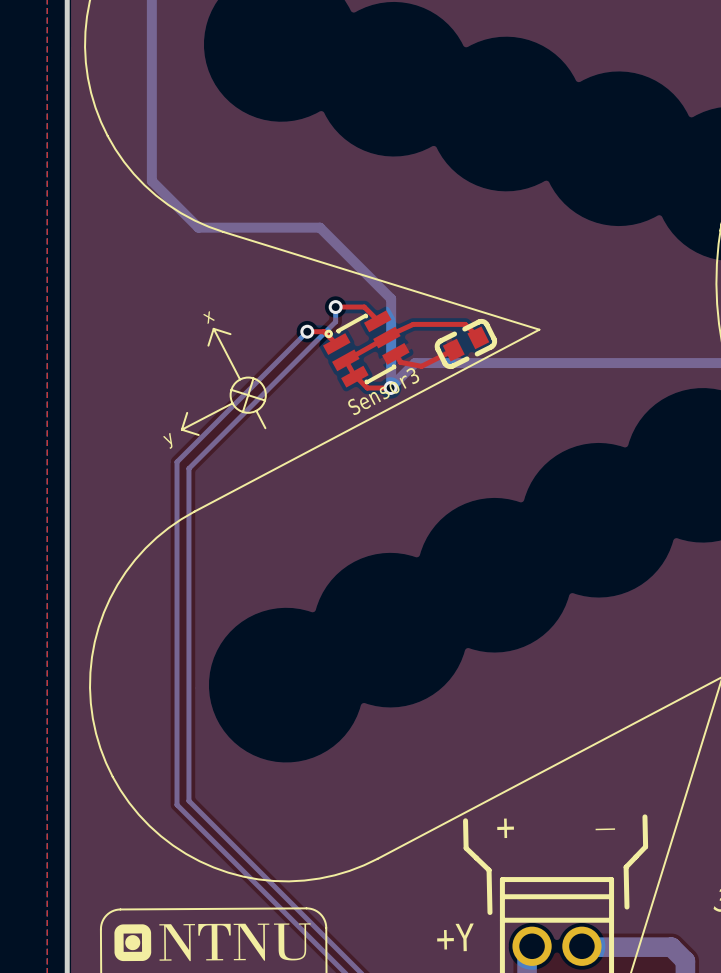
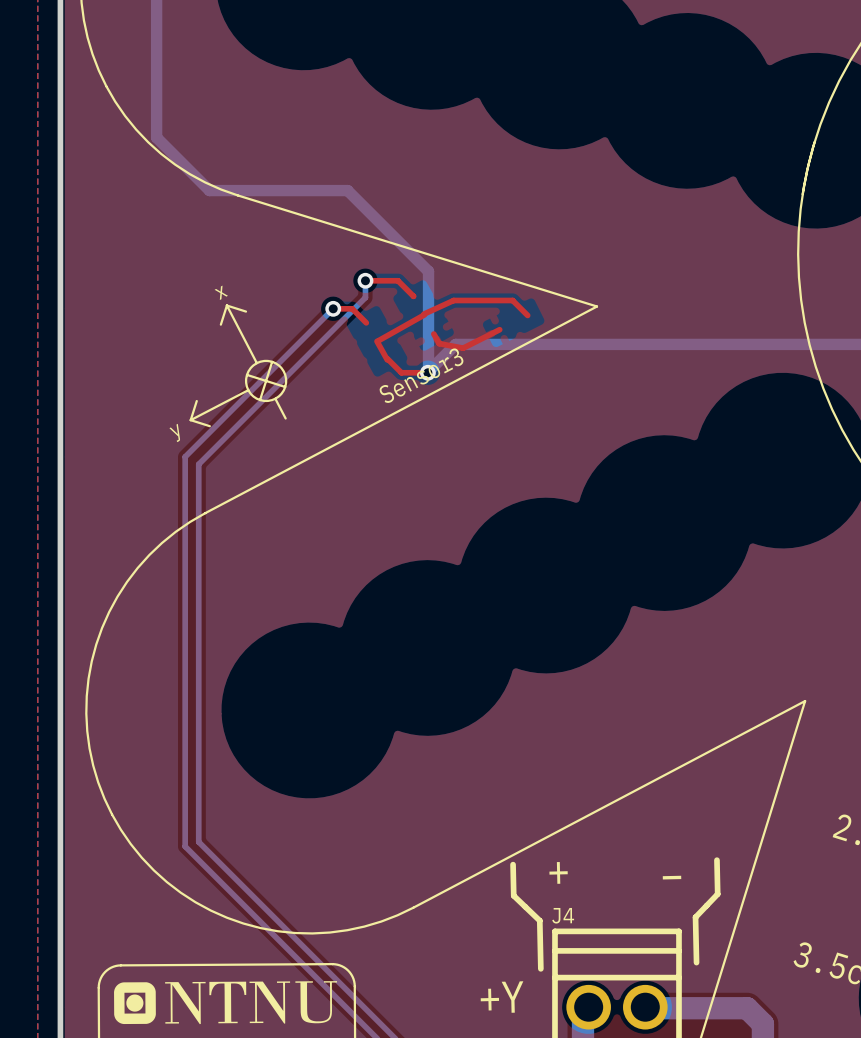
part: (465, 343) -> none
part: (366, 348) -> none
J4 name: none -> J4 (563, 915)

